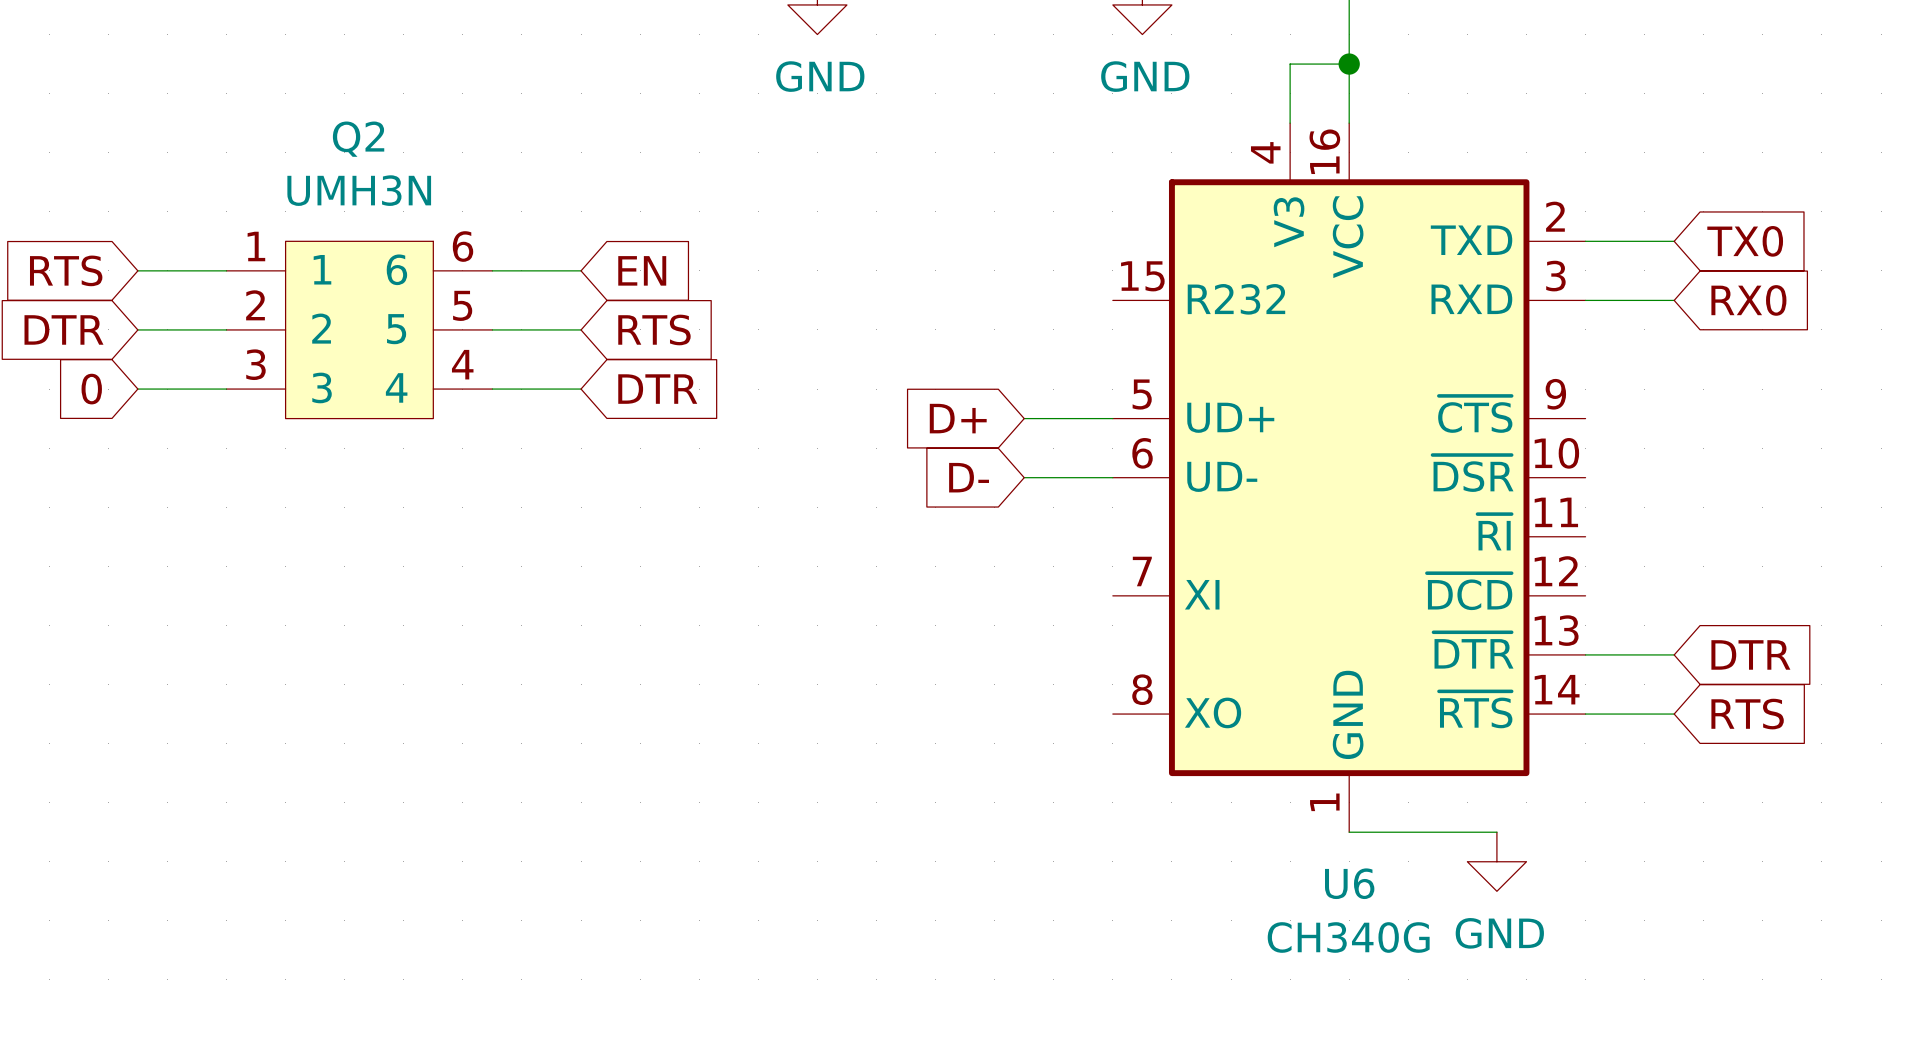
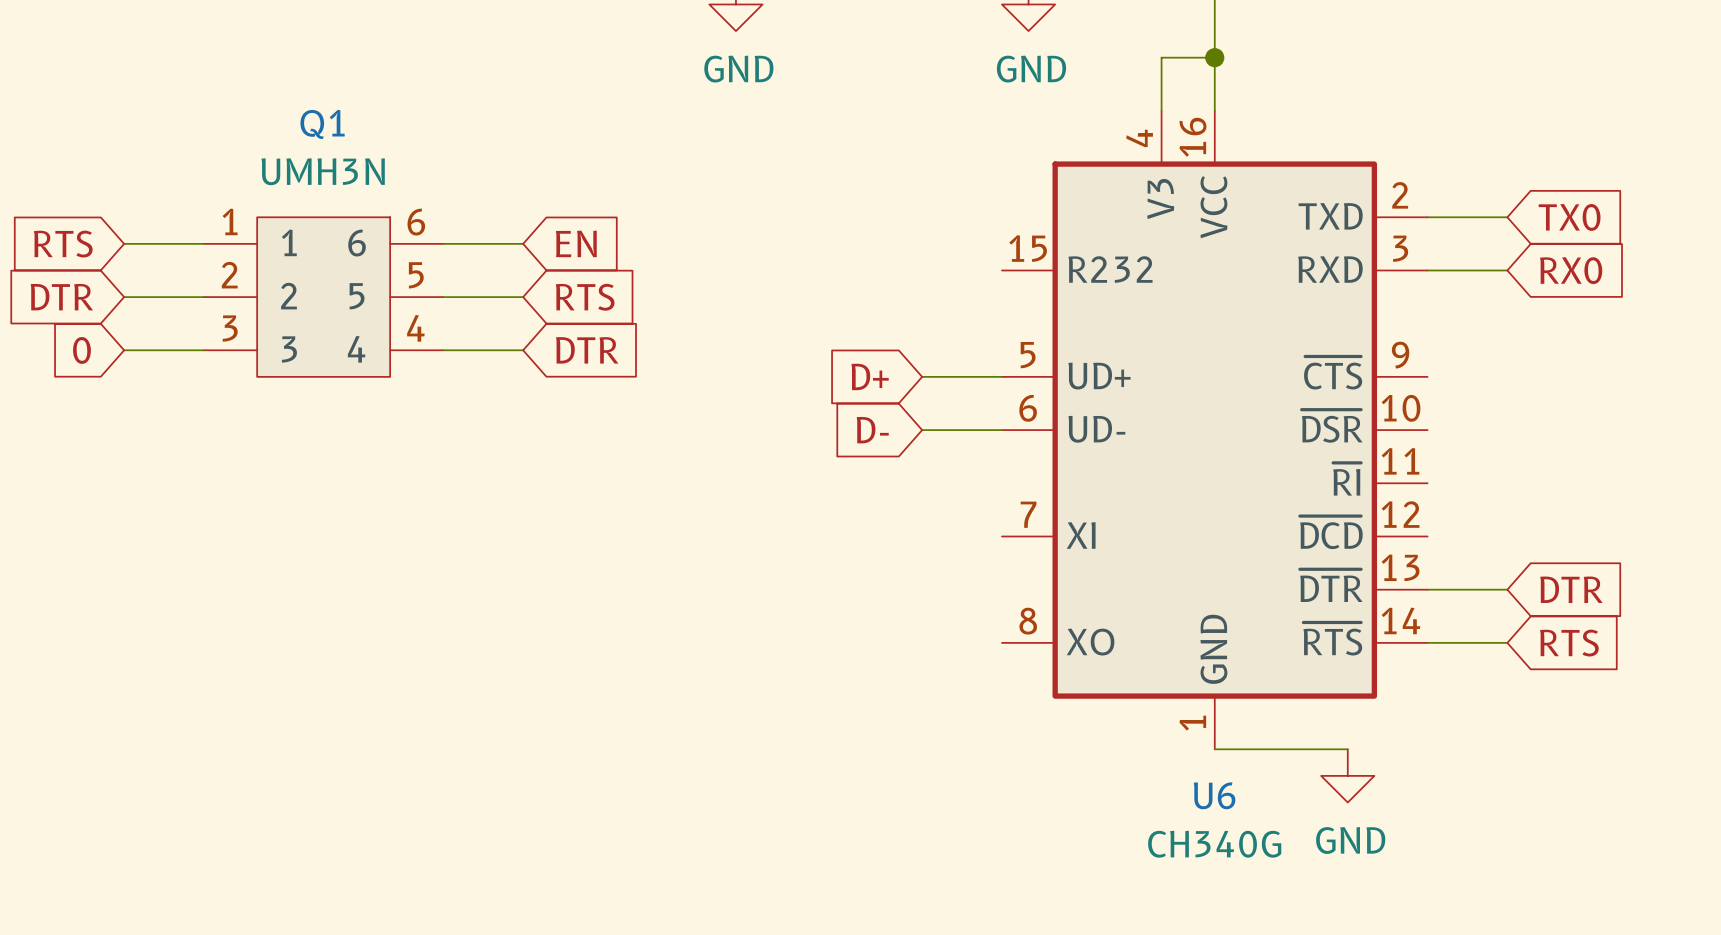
Q2 name: Q2 (358, 139) -> Q1 (322, 124)

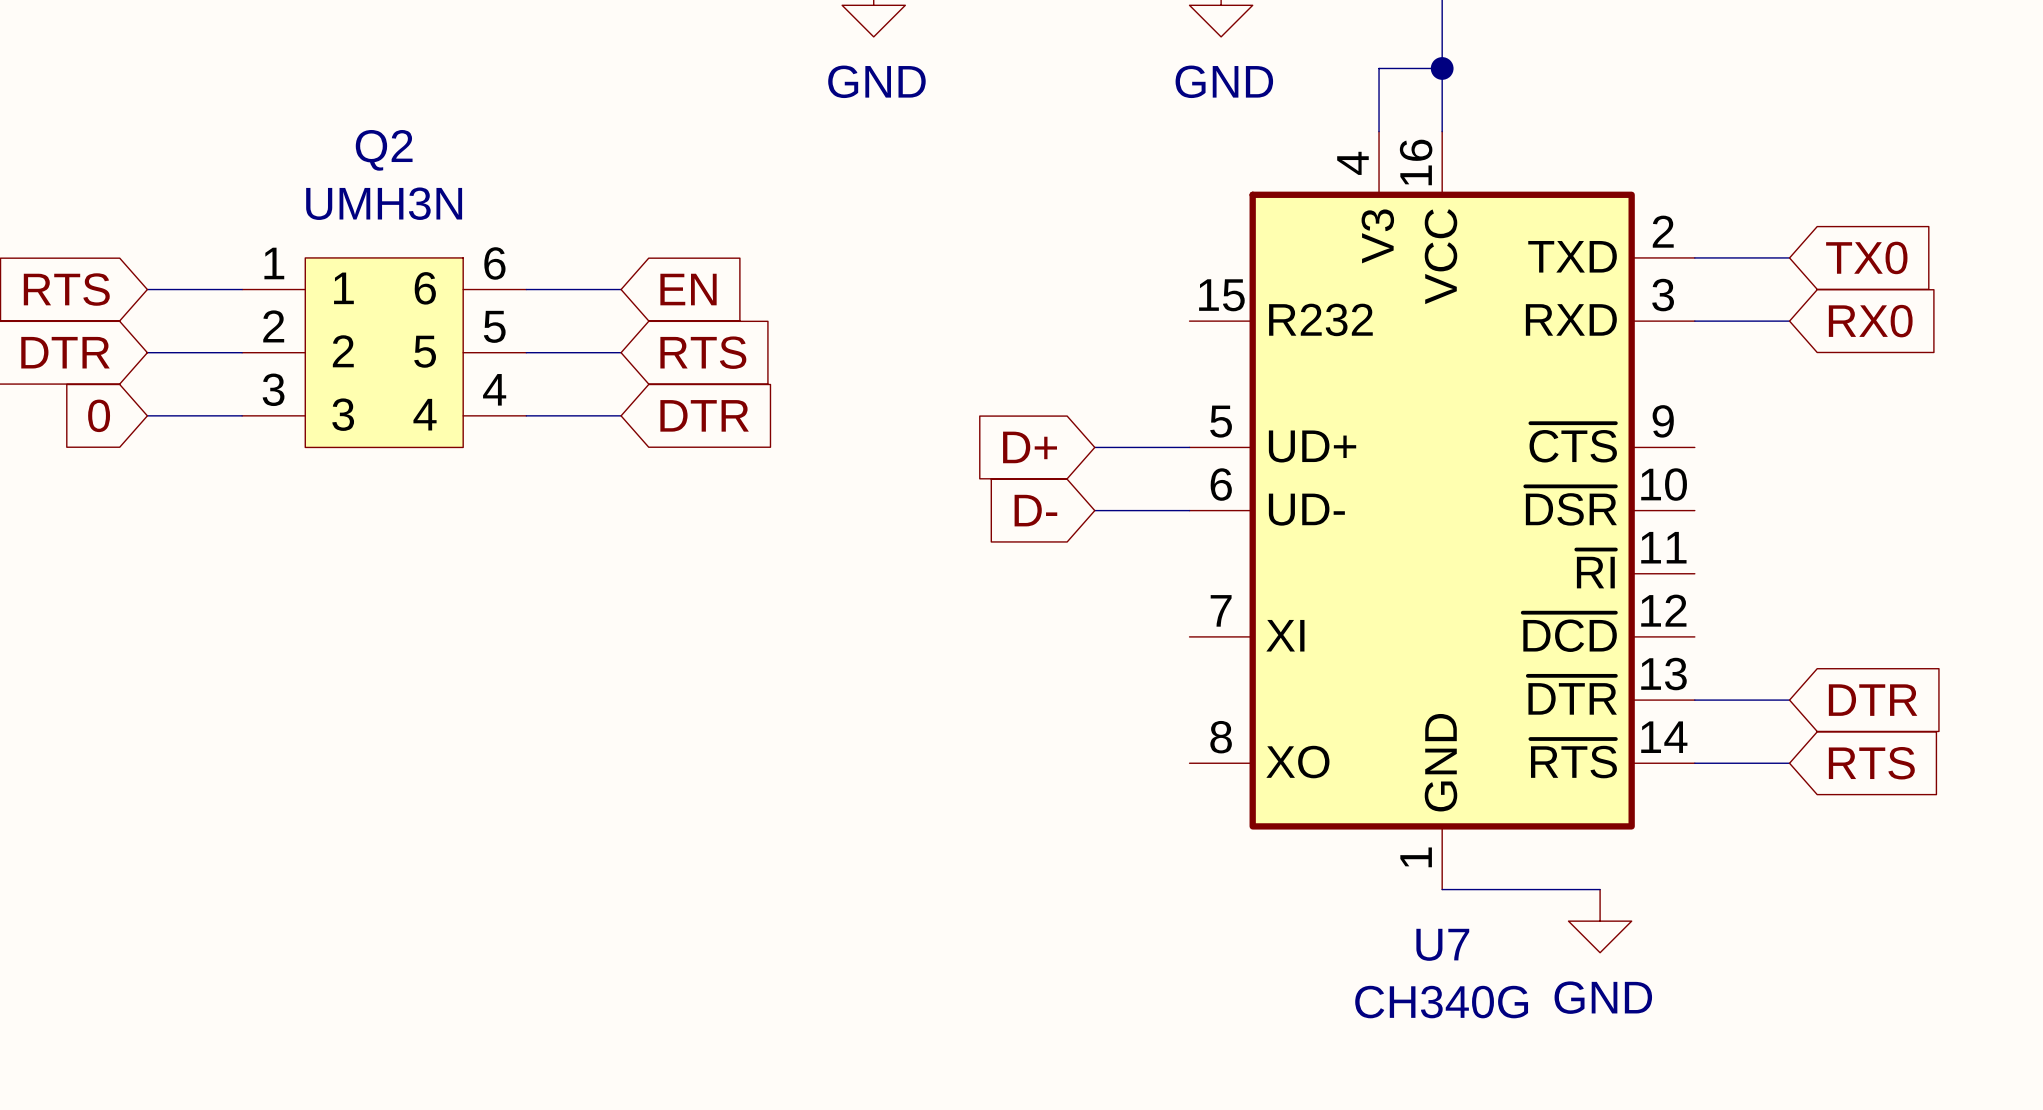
Q1 name: Q1 (322, 124) -> Q2 (384, 150)
U6 name: U6 (1214, 795) -> U7 (1442, 944)

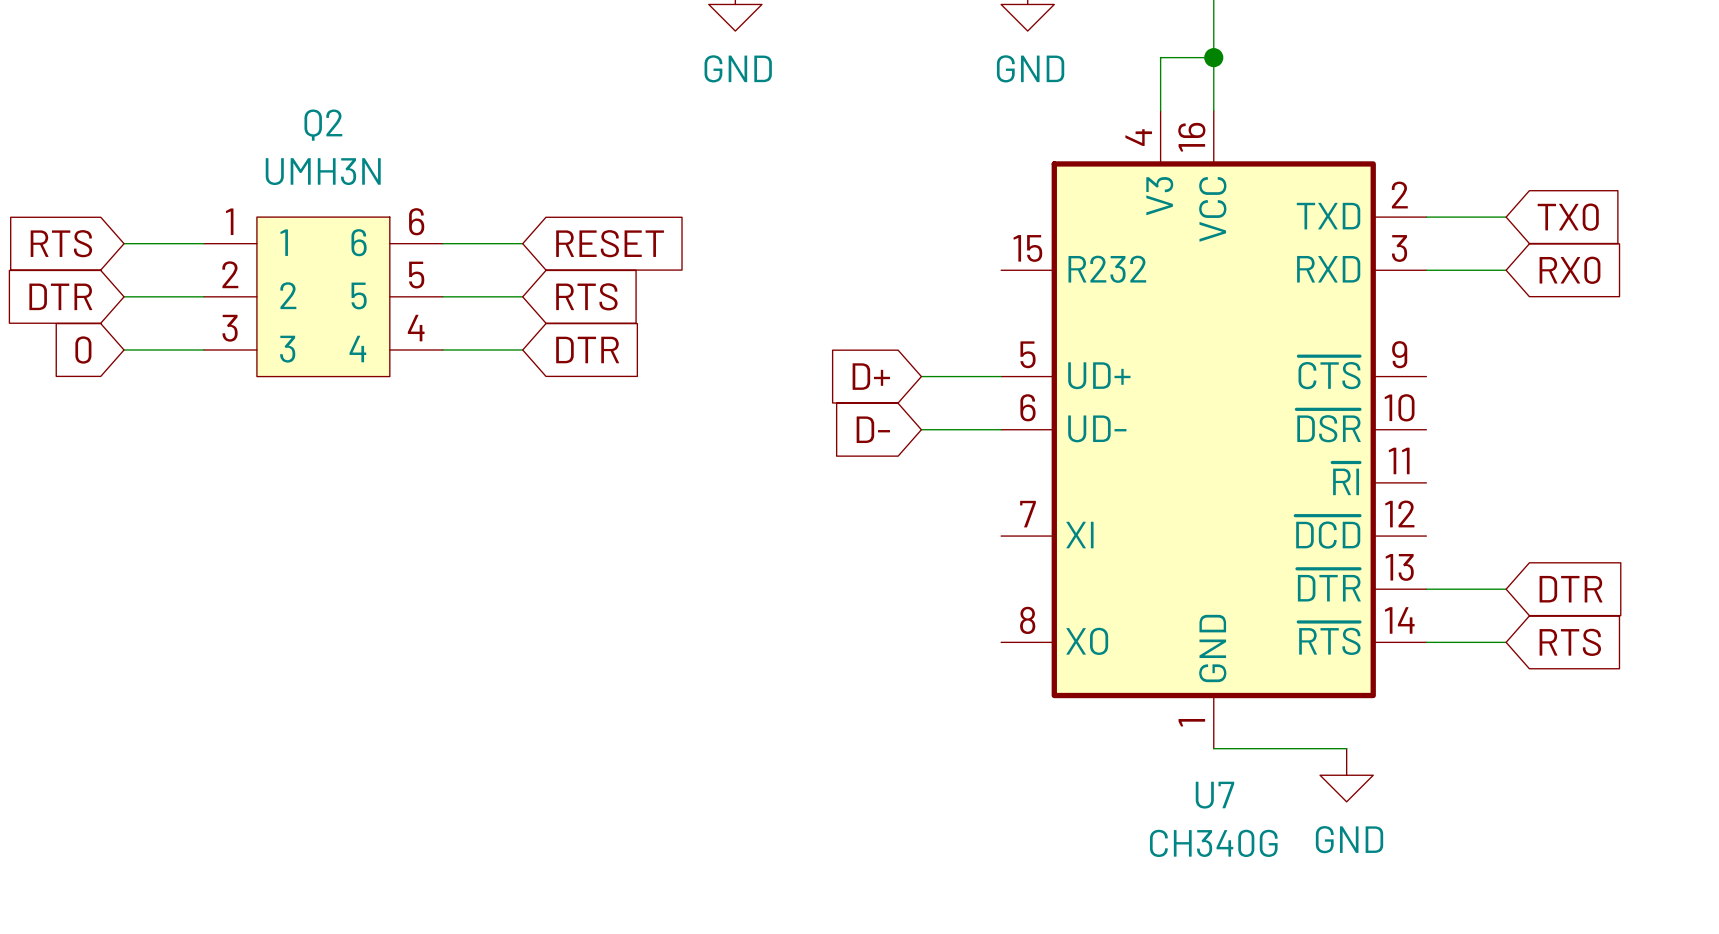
global label: EN (688, 289) -> RESET (610, 243)

